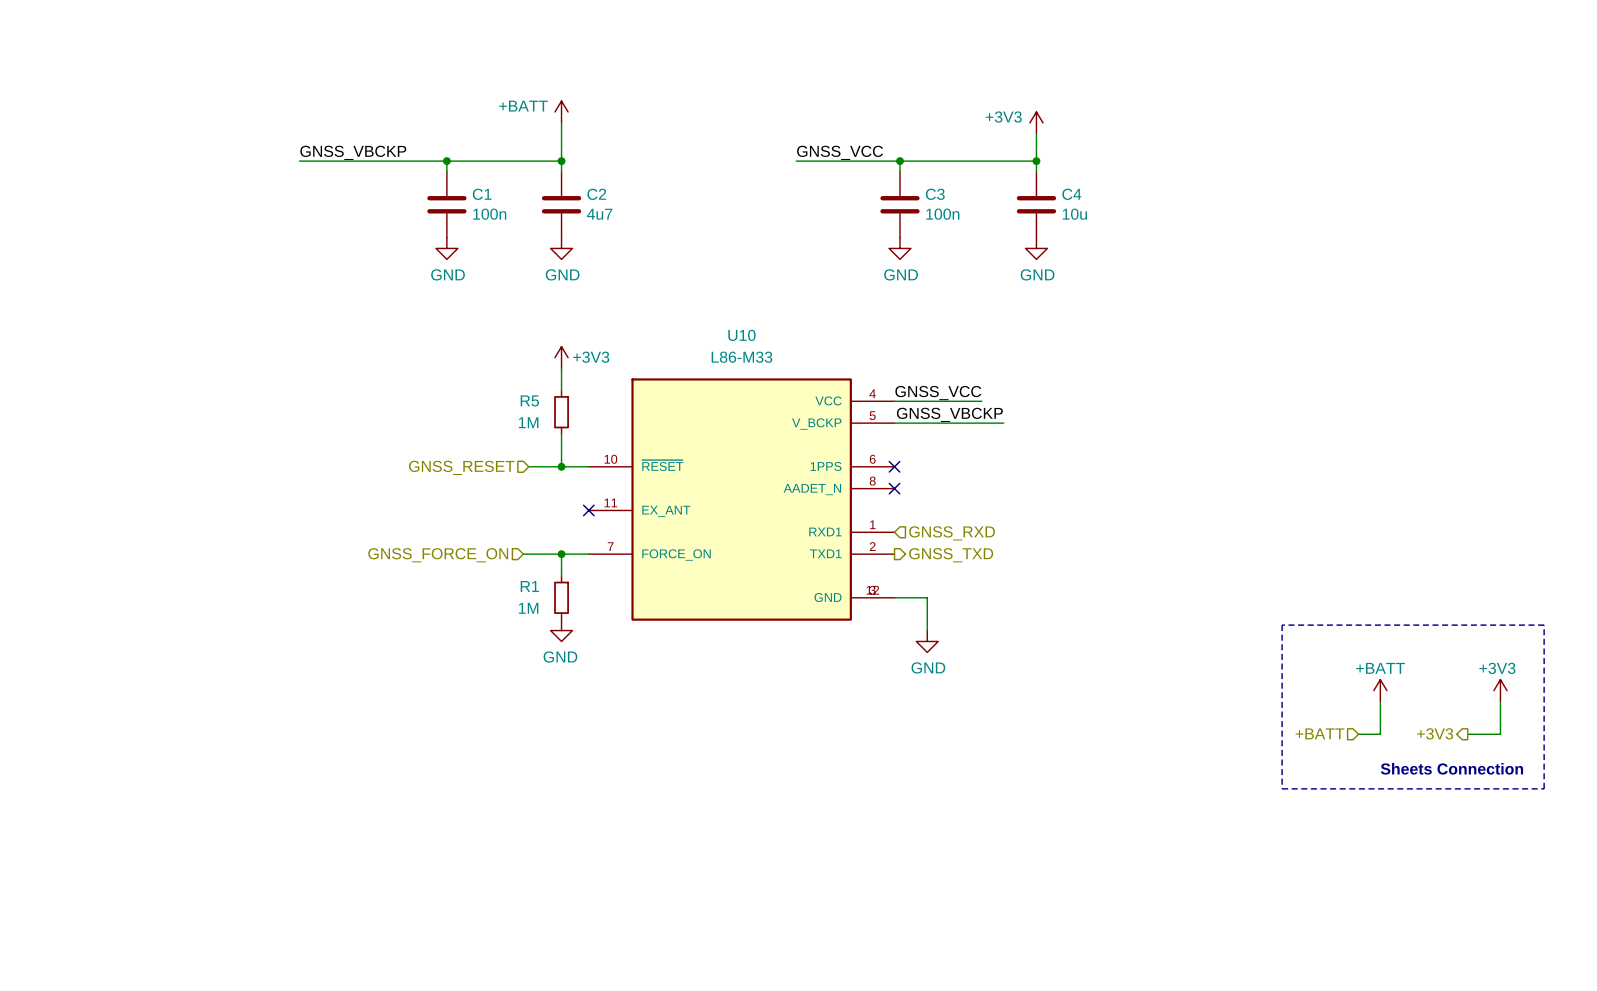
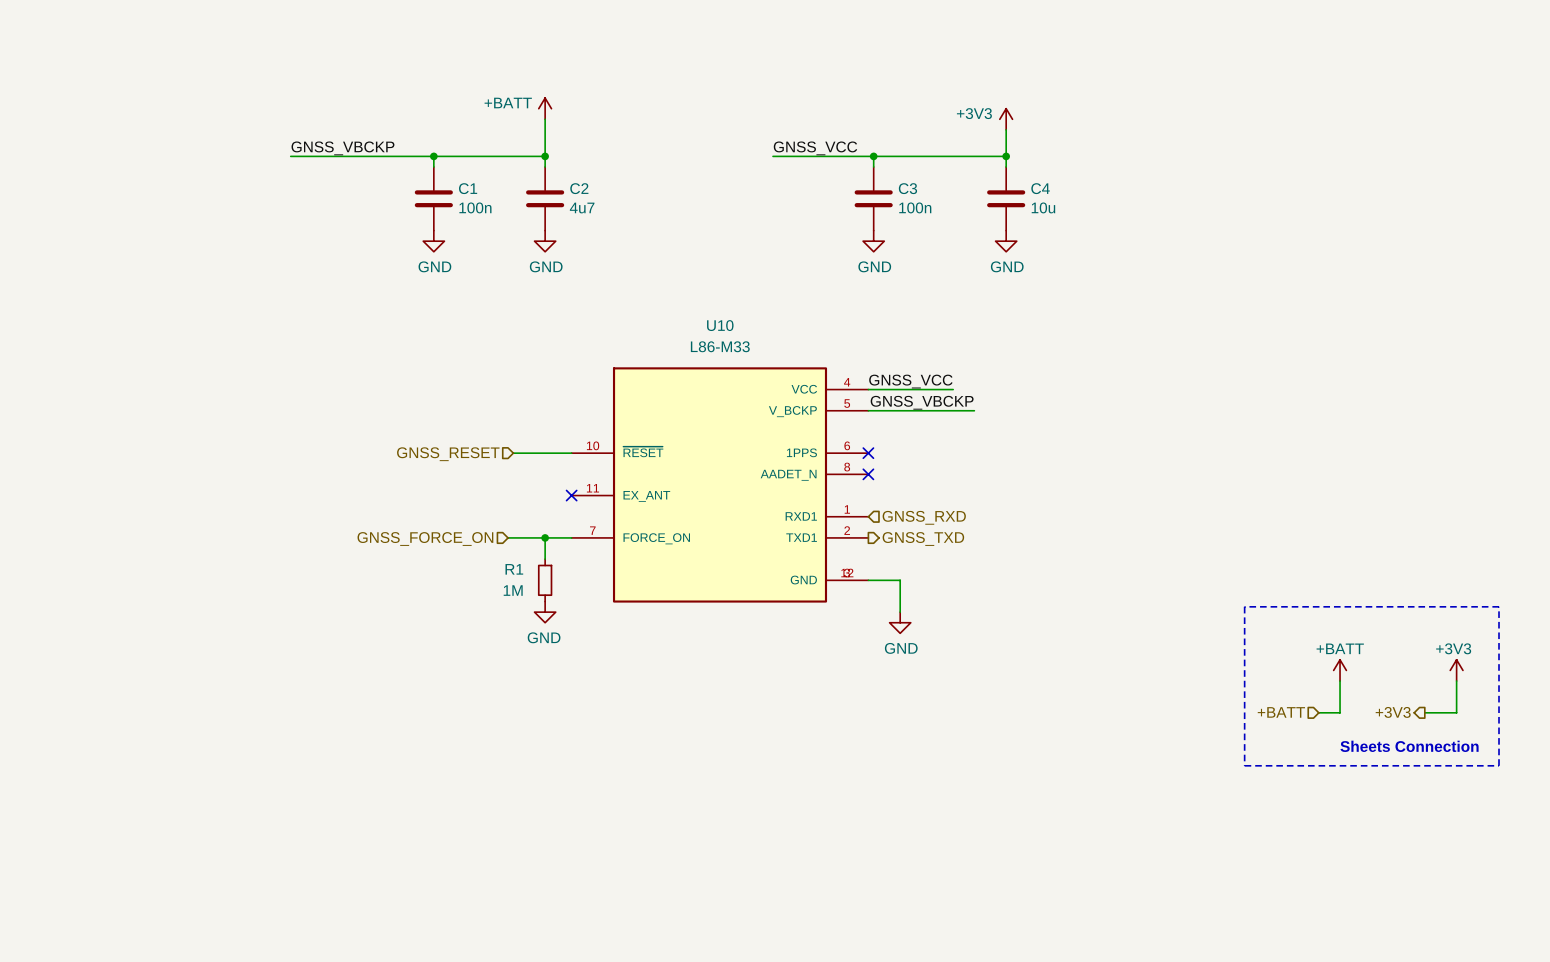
power symbol: +3V3 (561, 357) -> none
wire: (561, 368) (561, 390) -> none
R5: 1M (561, 412) -> none
wire: (561, 434) (561, 466) -> none
junction: (561, 466) -> none

